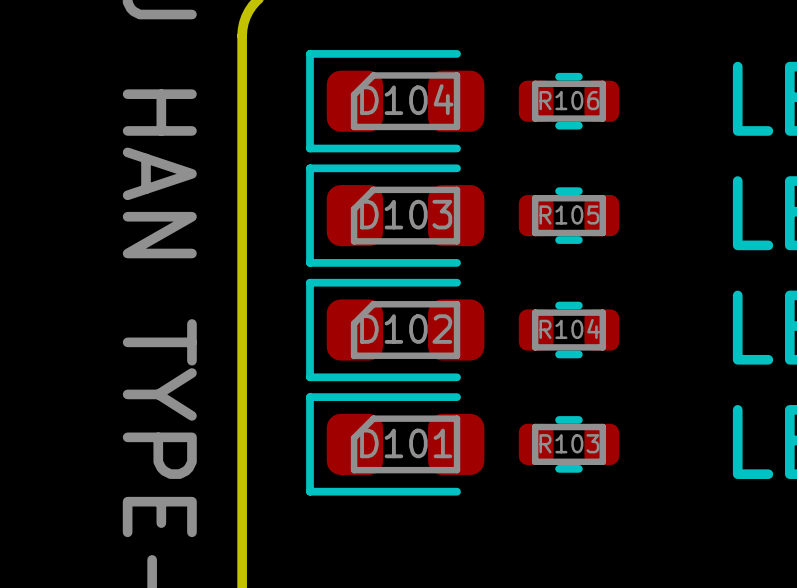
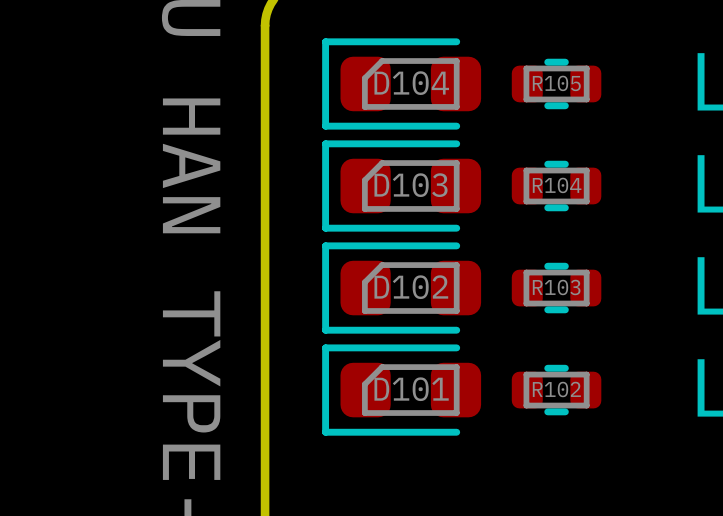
R106 name: R106 (569, 100) -> R105 (556, 83)
R105 name: R105 (569, 214) -> R104 (557, 185)
R104 name: R104 (569, 328) -> R103 (556, 287)
R103 name: R103 (569, 443) -> R102 (556, 389)

